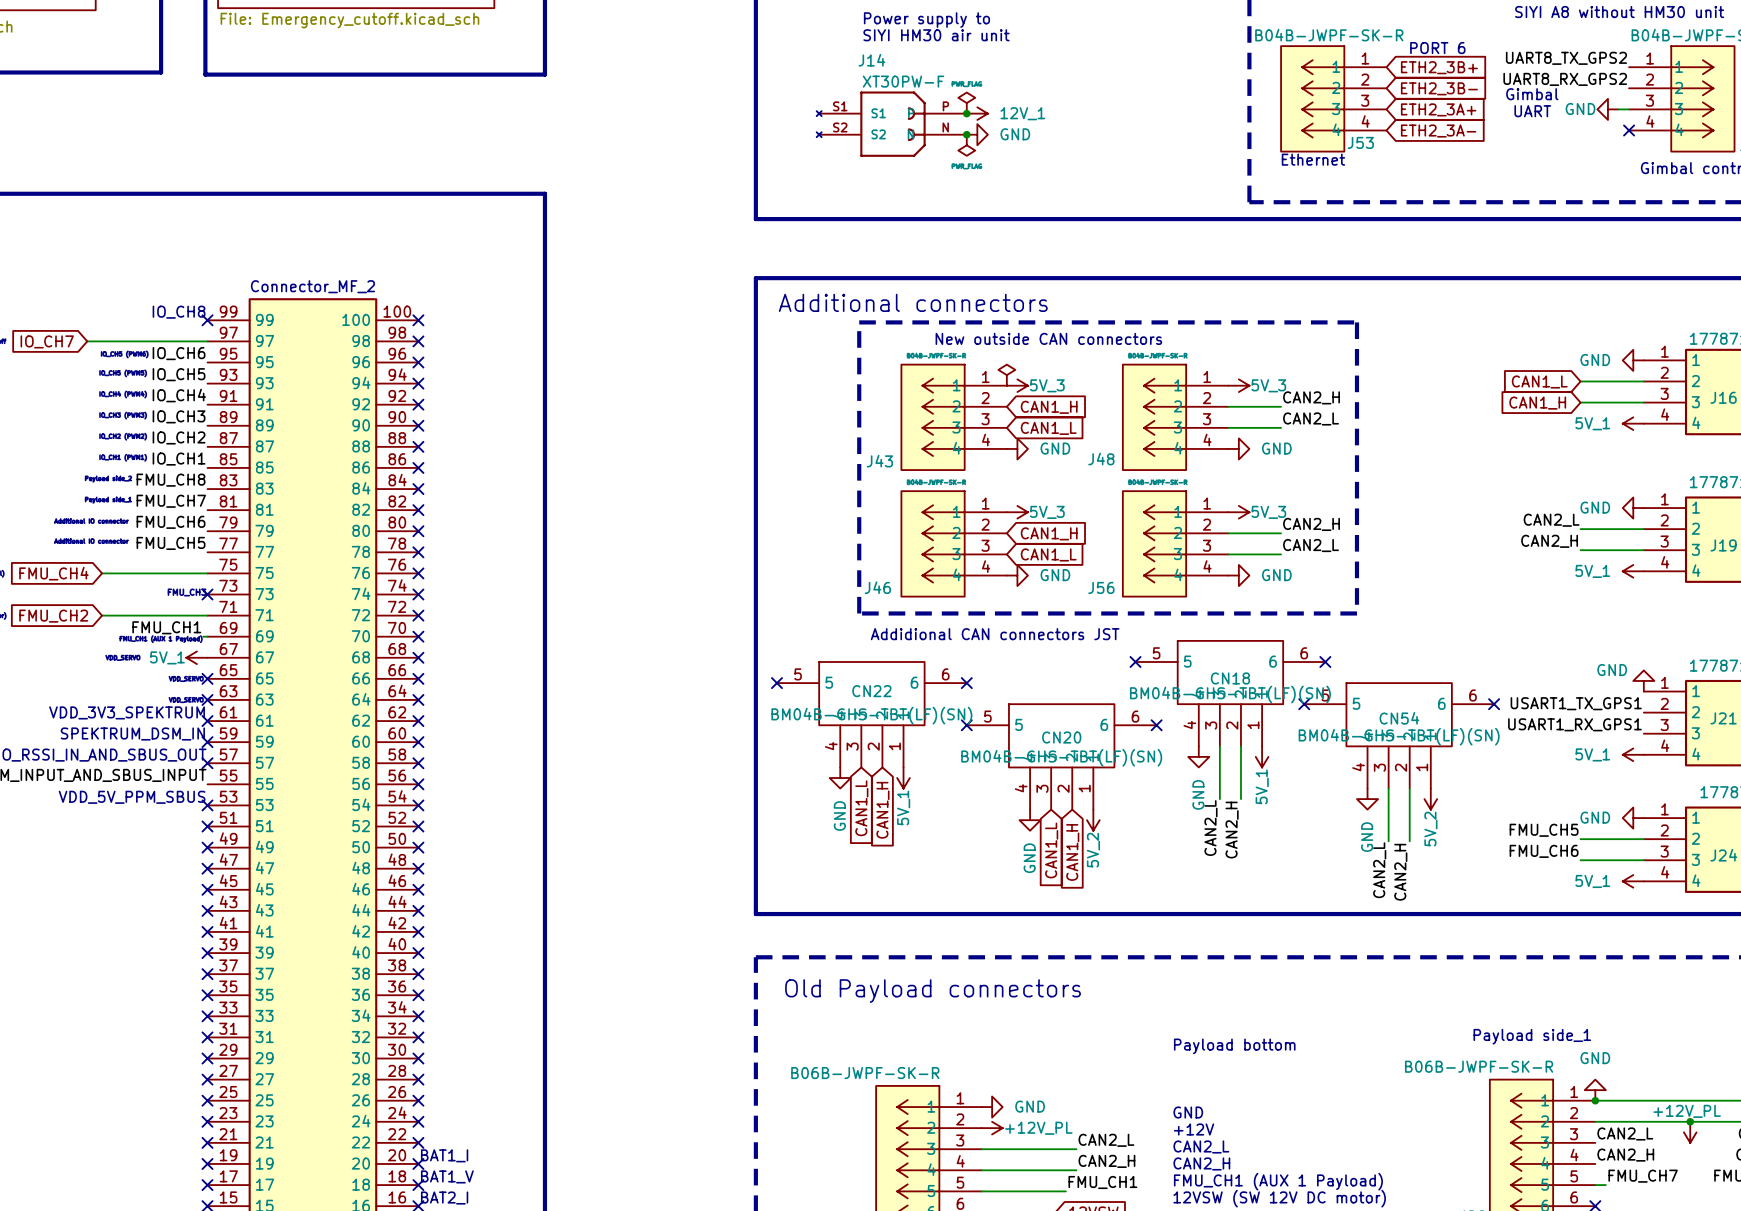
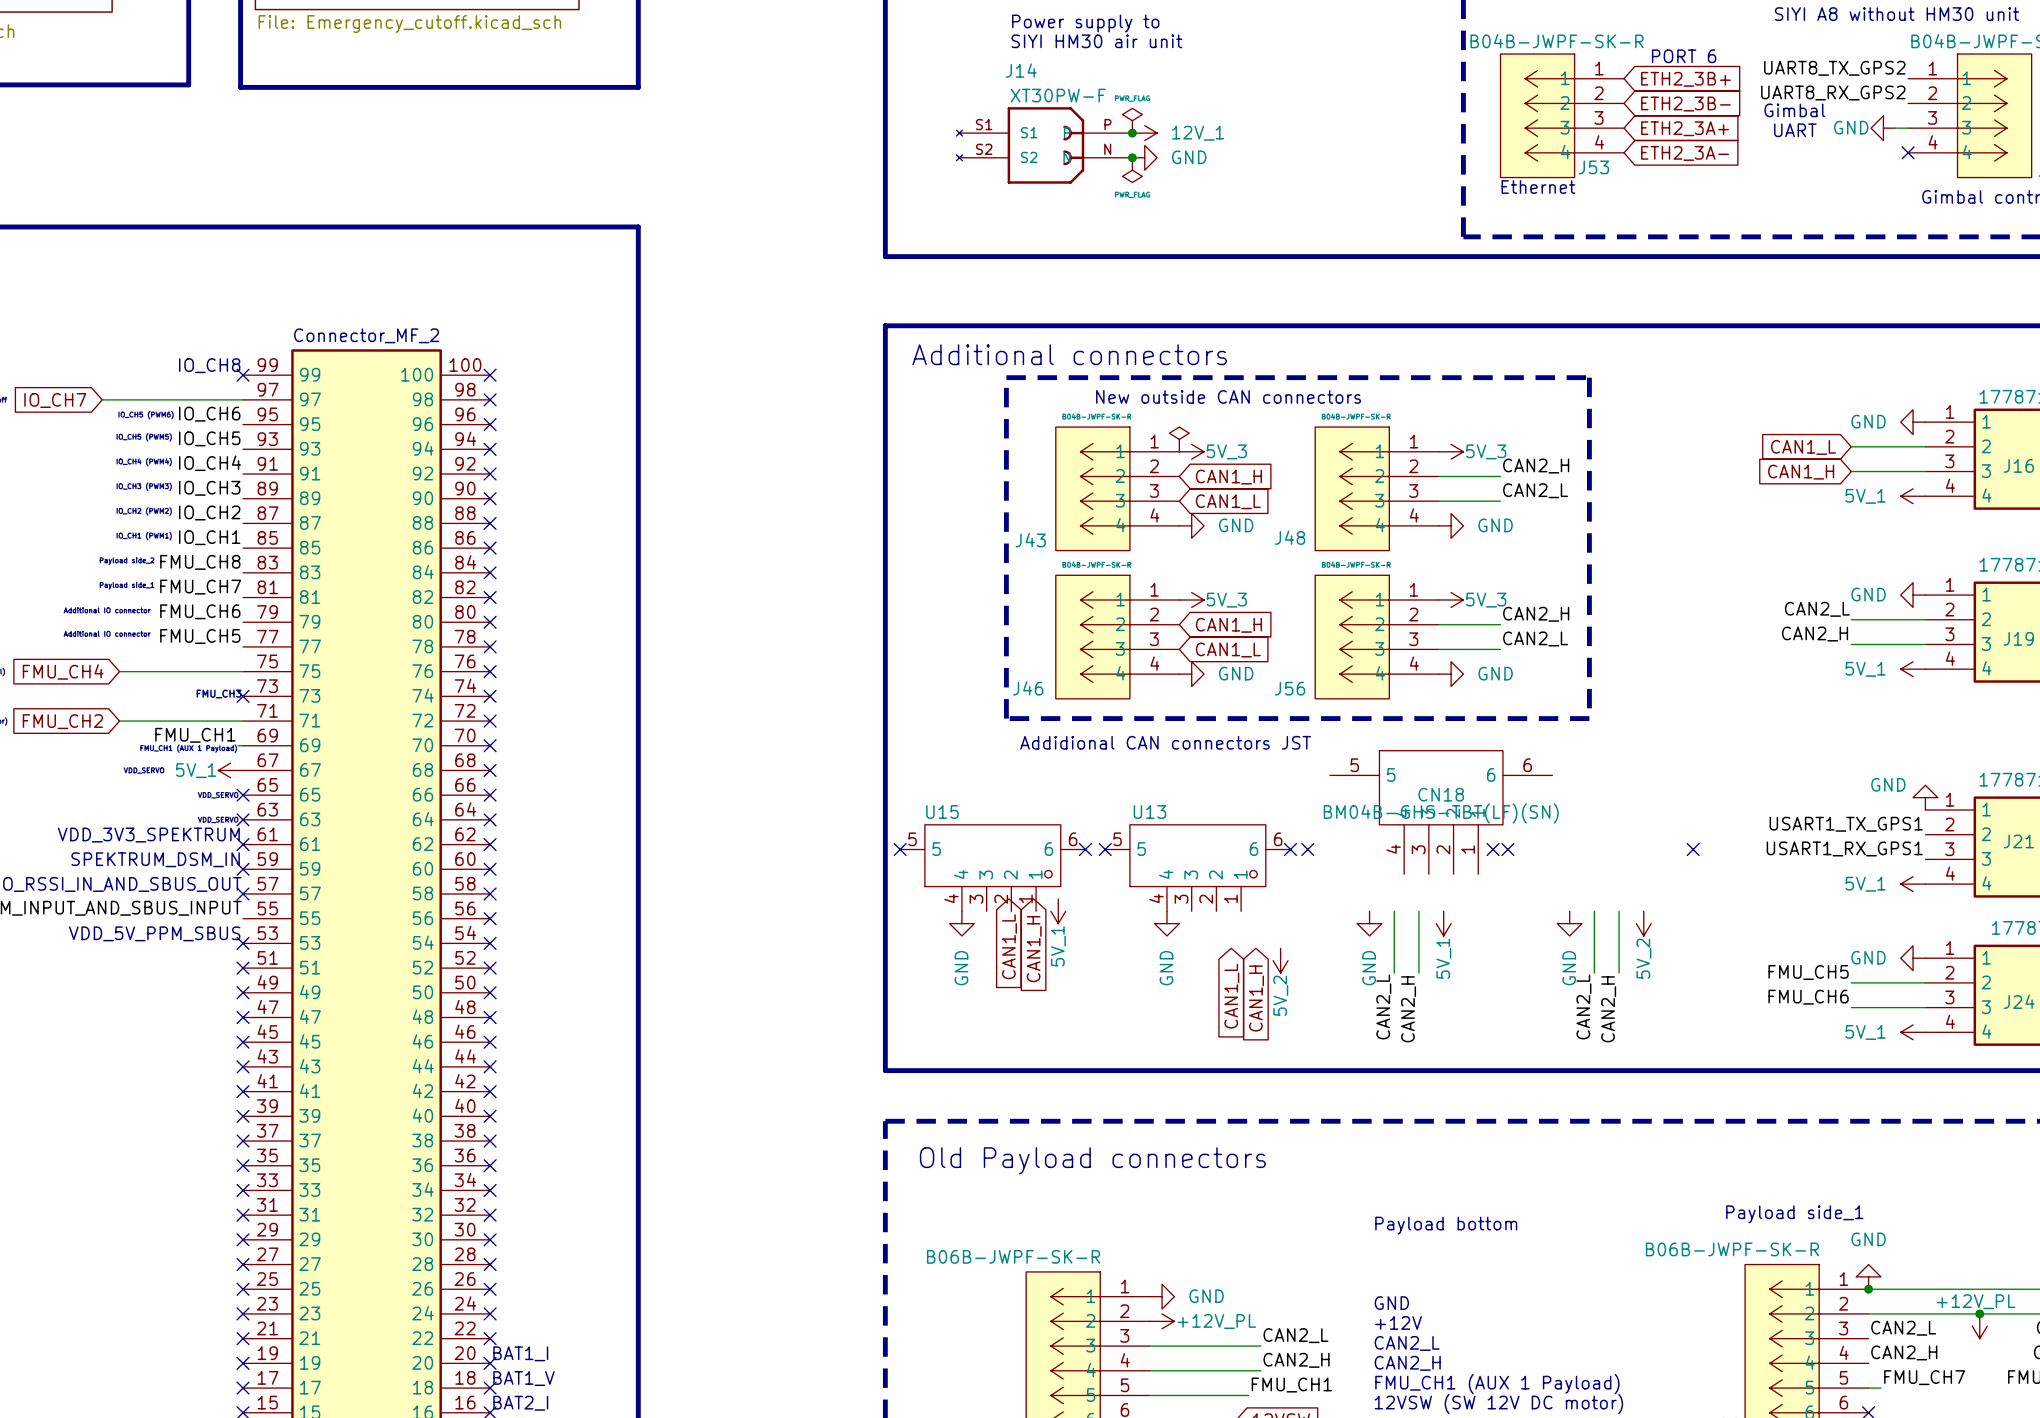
no-connect mark: (1135, 662) -> none
no-connect mark: (1325, 662) -> none
no-connect mark position: (776, 683) -> (900, 849)
no-connect mark: (966, 683) -> none
no-connect mark: (1304, 704) -> none
no-connect mark: (1494, 704) -> none
CN22: BM04B-GHS-TBT(LF)(SN) (871, 714) -> none
no-connect mark: none -> (1085, 849)
no-connect mark: none -> (1105, 849)
no-connect mark: (966, 725) -> none
no-connect mark: none -> (1290, 849)
no-connect mark: none -> (1307, 849)
no-connect mark: (1156, 725) -> none
no-connect mark: none -> (1493, 849)
no-connect mark: none -> (1507, 849)
no-connect mark: none -> (1693, 849)
CN54: BM04B-GHS-TBT(LF)(SN) (1399, 735) -> none
U15: none -> (992, 868)
U13: none -> (1197, 868)
wire: (1219, 746) (1219, 799) -> (1394, 911) (1394, 973)
wire: (1240, 746) (1240, 799) -> (1418, 911) (1418, 973)
CN20: BM04B-GHS-TBT(LF)(SN) (1061, 756) -> none
power symbol position: GND (1198, 756) -> GND (1369, 923)
power symbol position: 5V_1 (1262, 756) -> 5V_1 (1443, 923)
power symbol position: GND (840, 778) -> GND (961, 923)
wire: (1388, 788) (1388, 841) -> (1594, 911) (1594, 973)
wire: (1409, 788) (1409, 841) -> (1619, 911) (1619, 973)
power symbol position: GND (1367, 799) -> GND (1569, 923)
power symbol position: 5V_2 (1430, 799) -> 5V_2 (1643, 923)
power symbol position: GND (1030, 820) -> GND (1166, 923)
label position: CAN2_L (1210, 828) -> CAN2_L (1383, 1006)
label position: CAN2_H (1232, 830) -> CAN2_H (1408, 1009)
label position: CAN2_L (1379, 870) -> CAN2_L (1583, 1006)
label position: CAN2_H (1400, 872) -> CAN2_H (1608, 1009)

